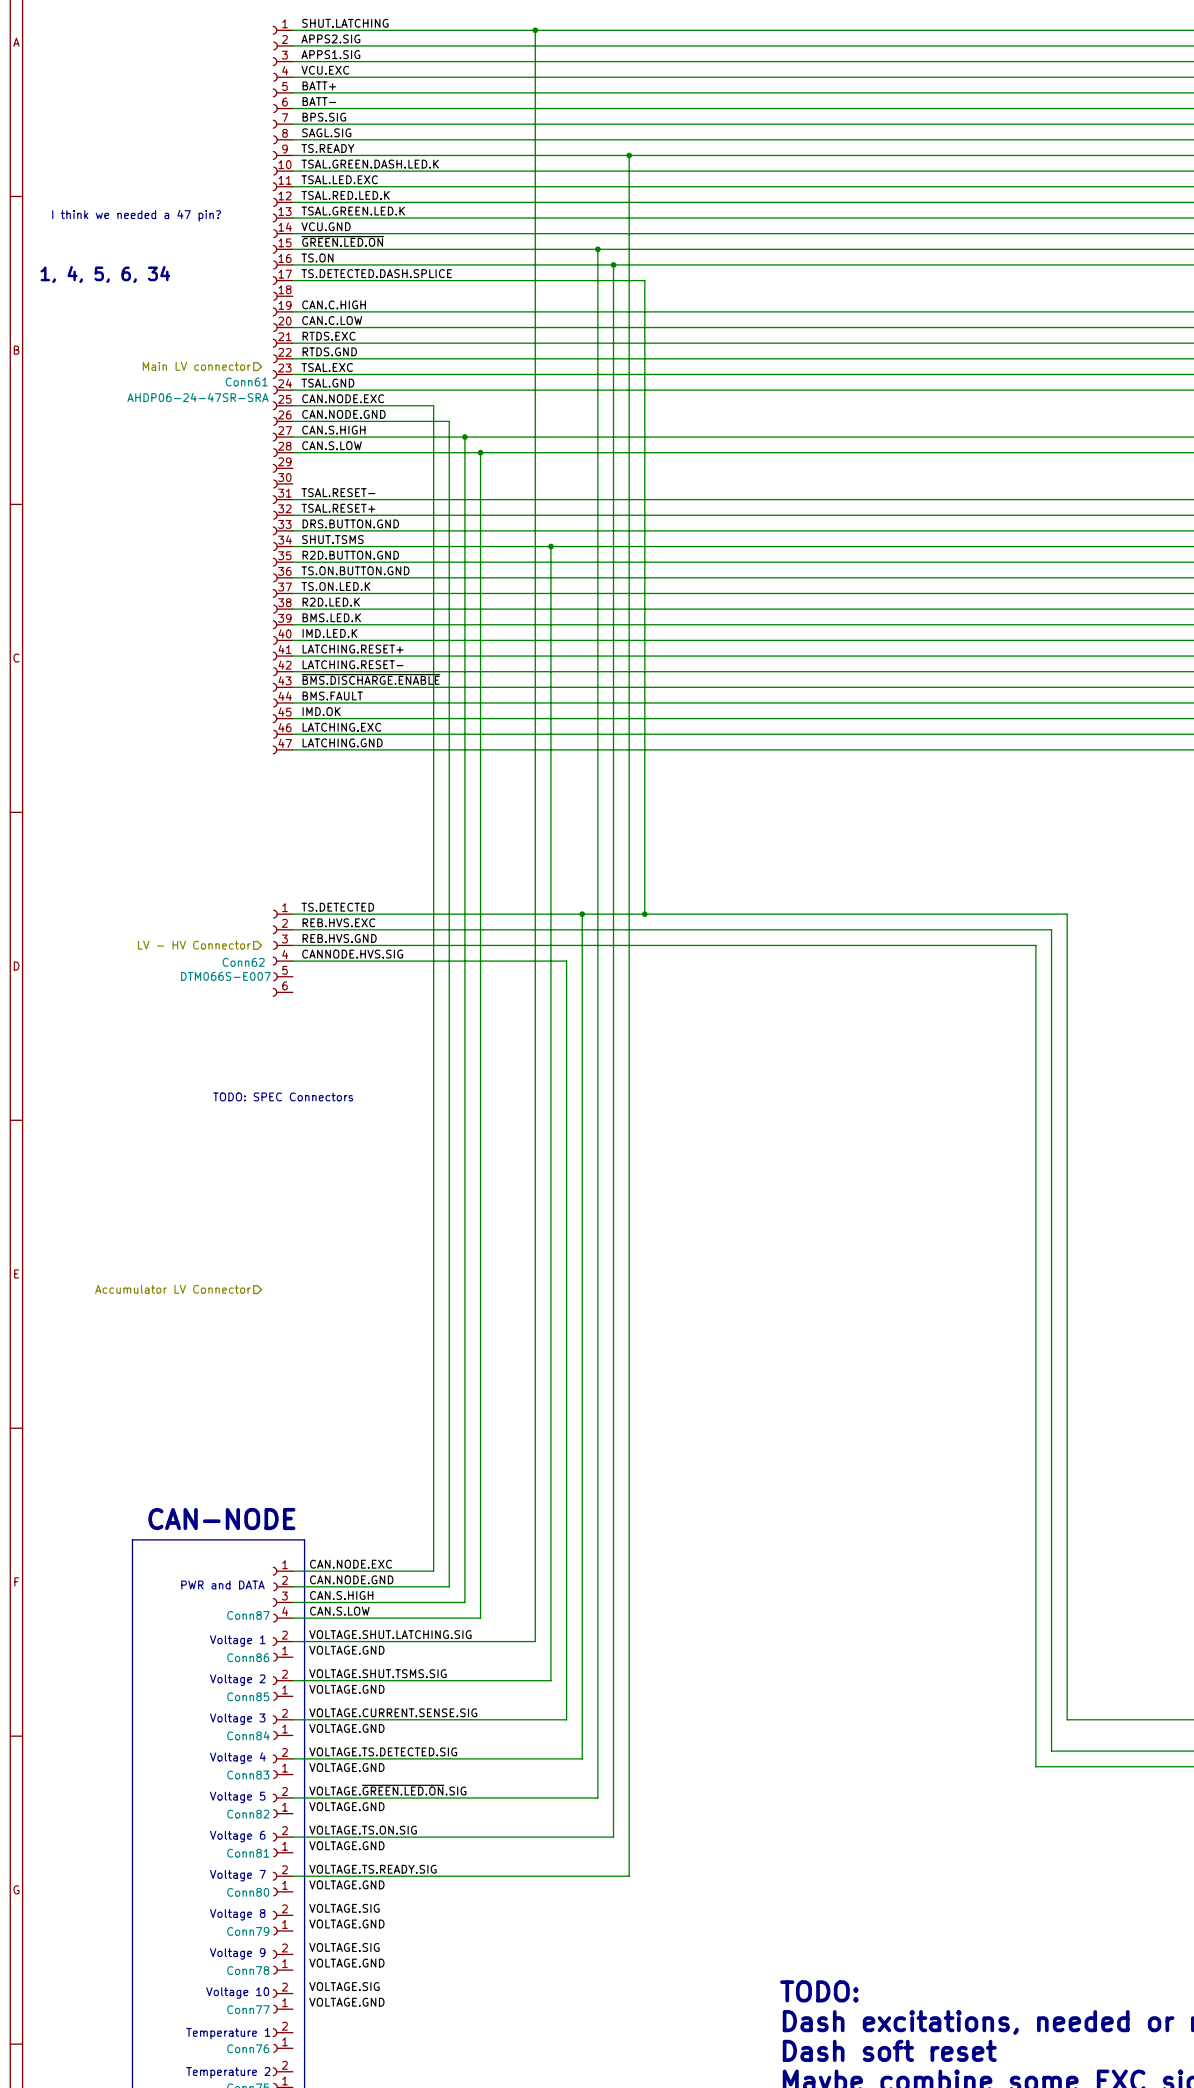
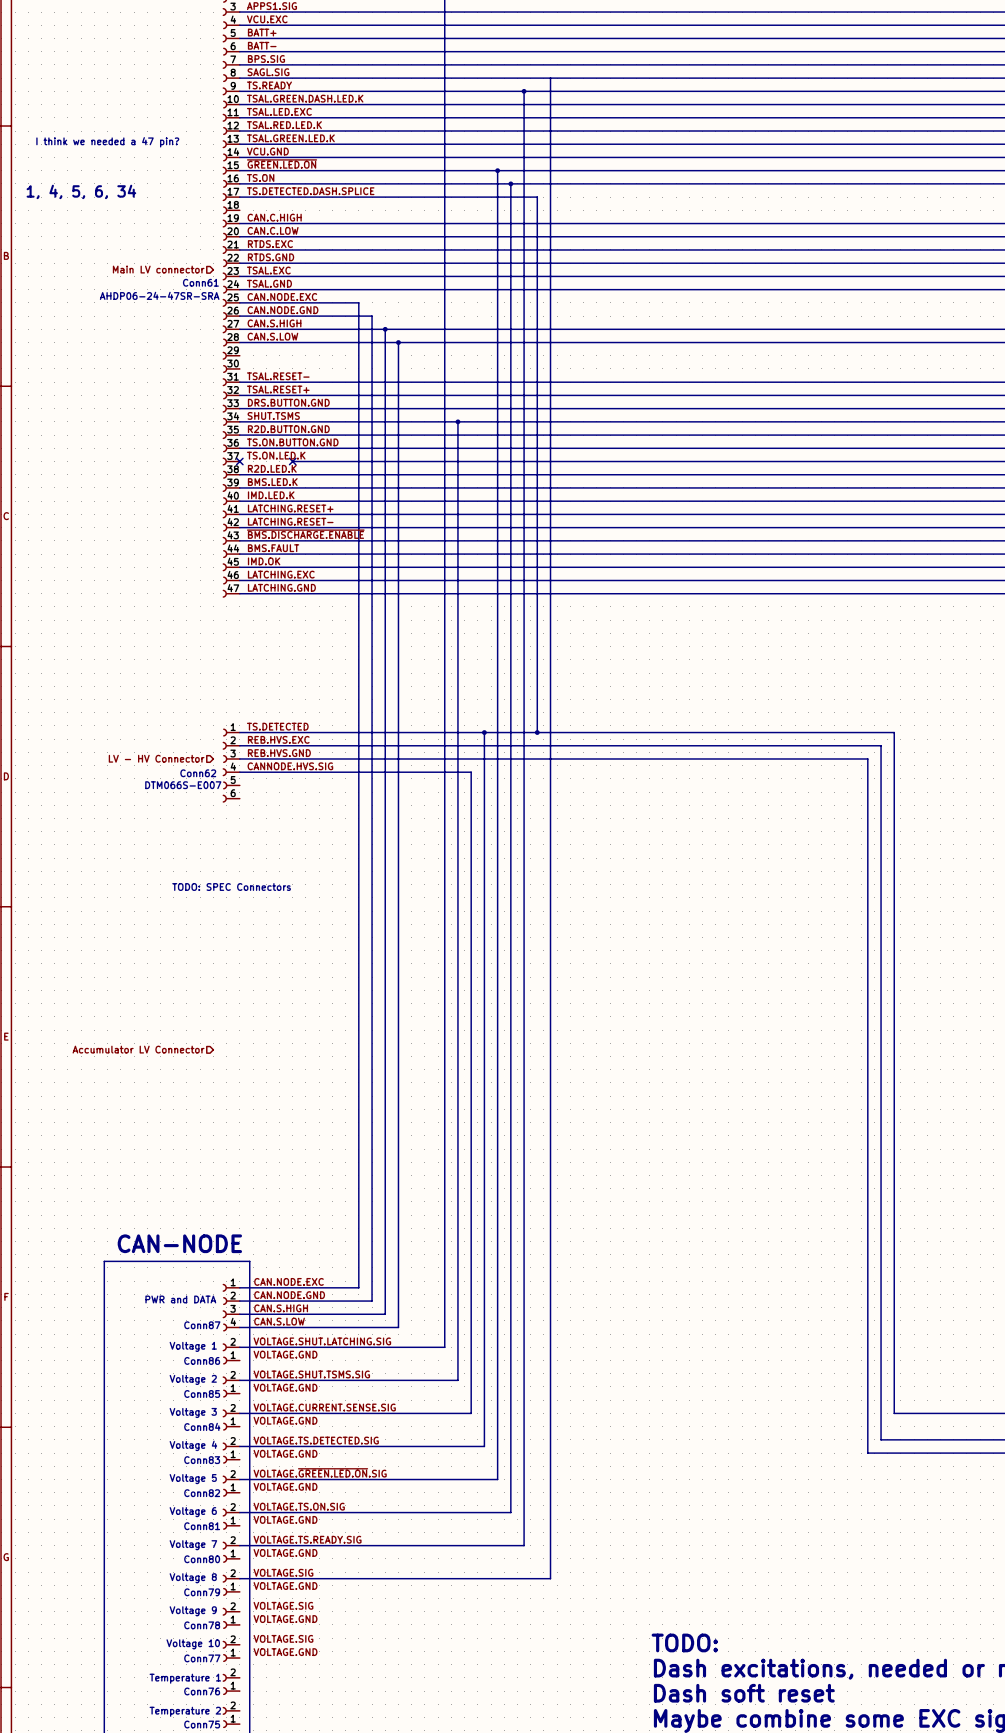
wire: none -> (550, 78) (550, 1578) (239, 1578)
wire: (292, 593) (355, 593) -> none
no-connect mark: none -> (239, 461)
no-connect mark: none -> (292, 461)

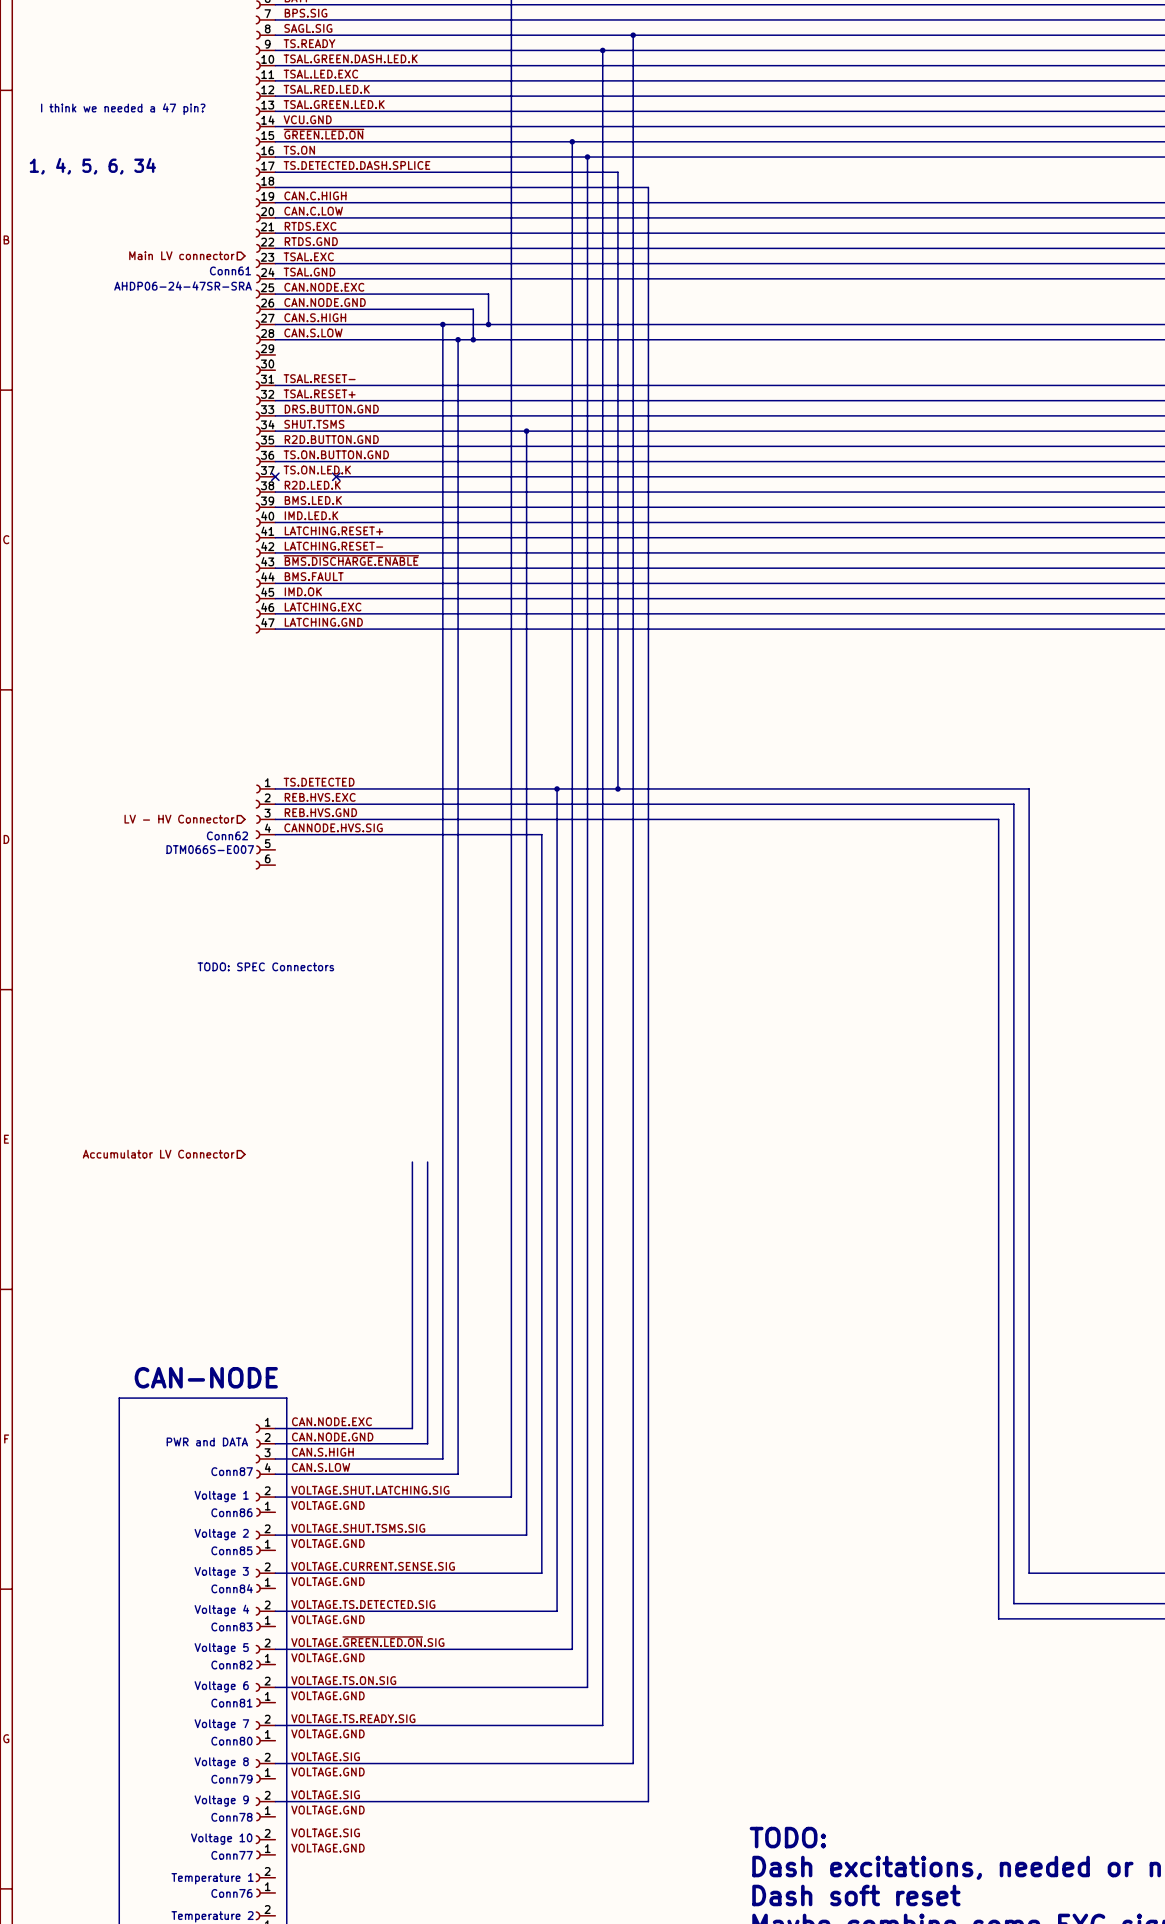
junction: none -> (633, 35)
wire: none -> (275, 187) (648, 187) (648, 1801) (275, 1801)
wire: (358, 302) (358, 1056) -> (412, 294) (488, 294) (488, 324)
wire: (372, 316) (372, 1056) -> (427, 309) (473, 309) (473, 339)
junction: none -> (488, 324)
junction: none -> (473, 339)

